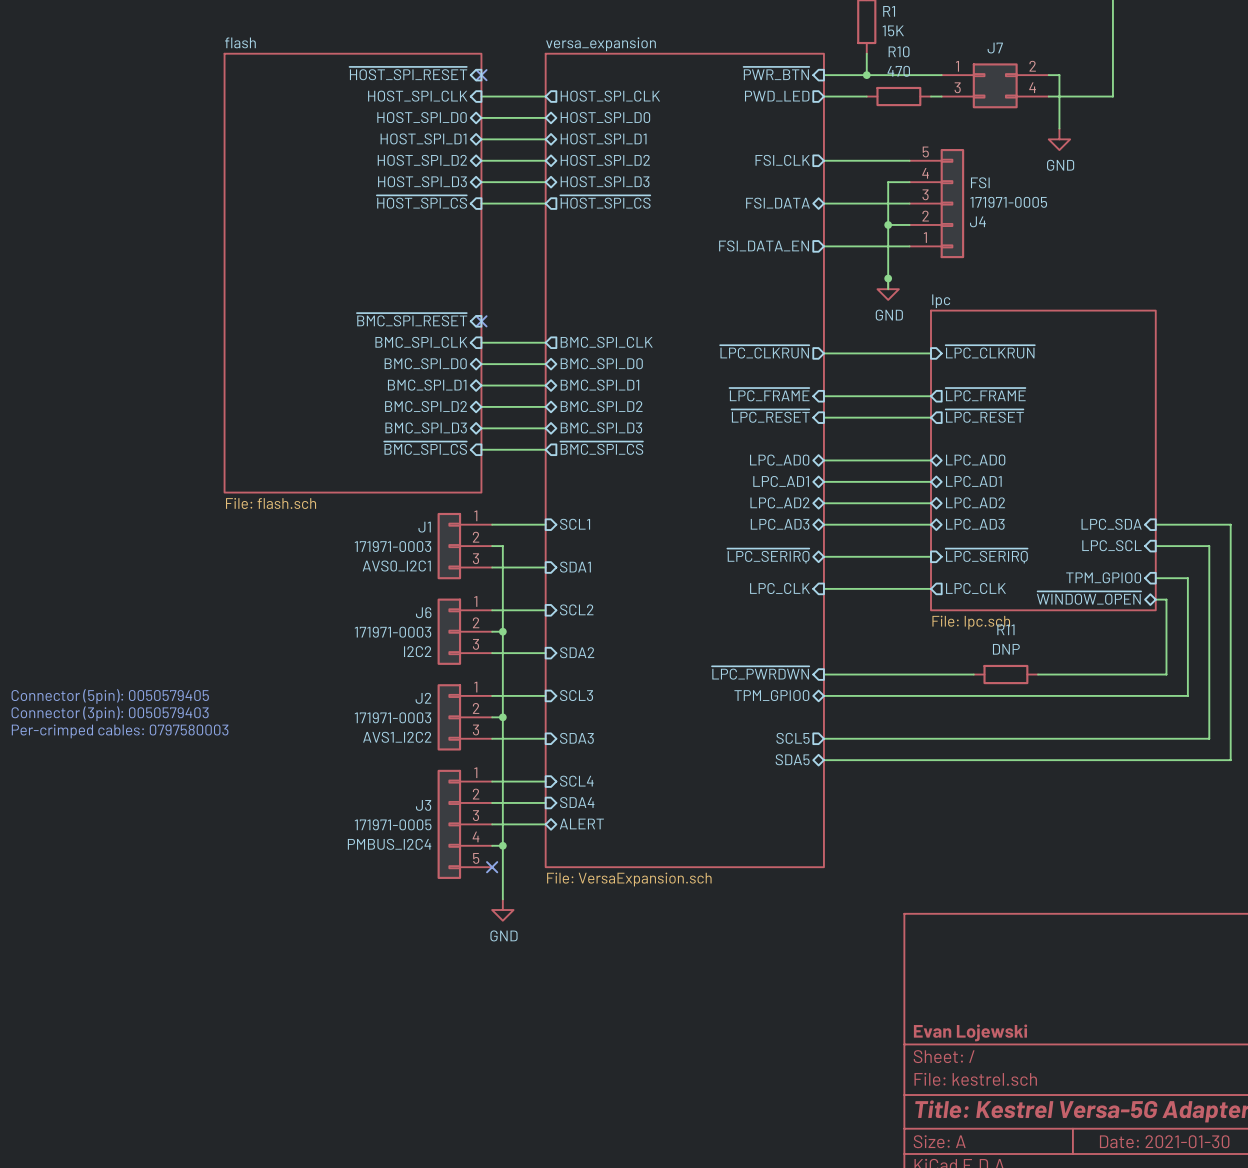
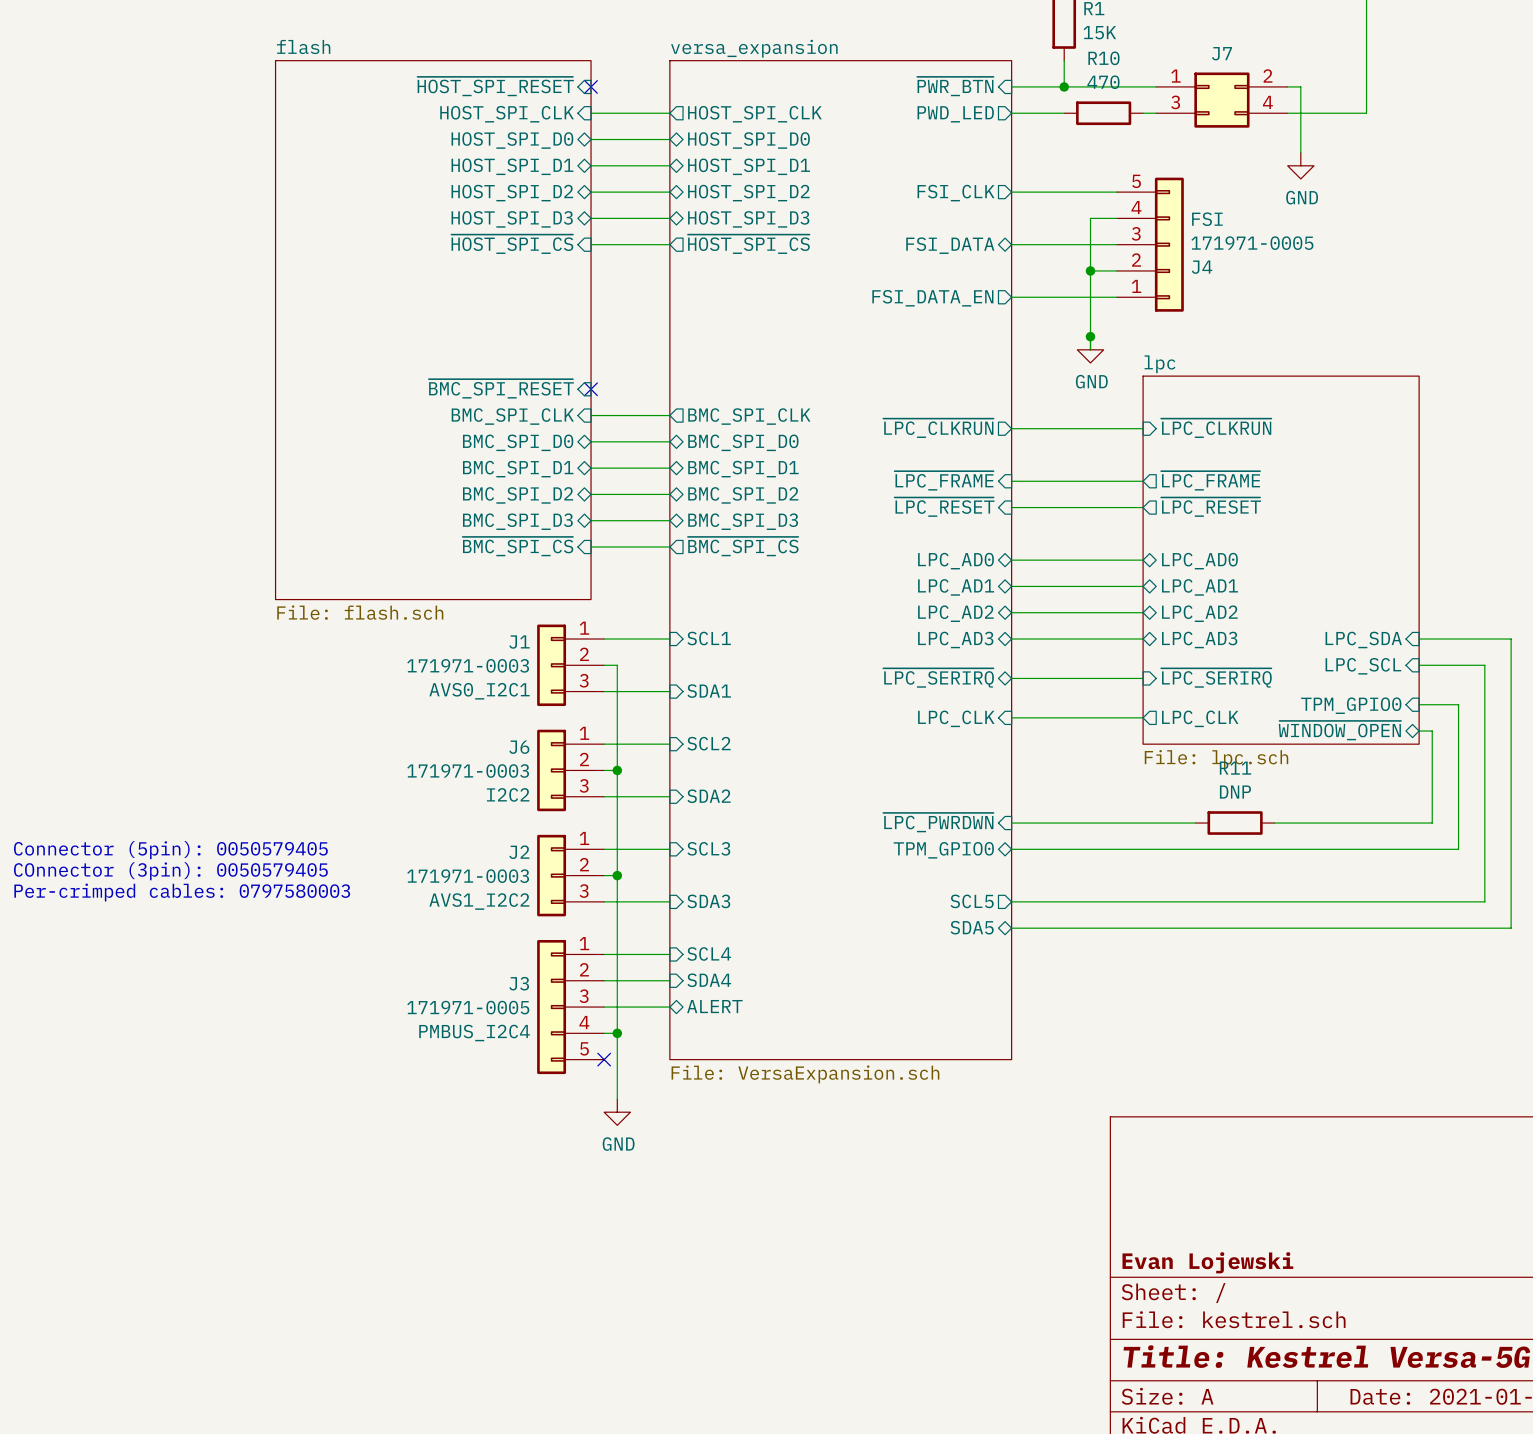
text: Connector (3pin): 0050579403 (110, 713) -> COnnector (3pin): 0050579405 (170, 871)

